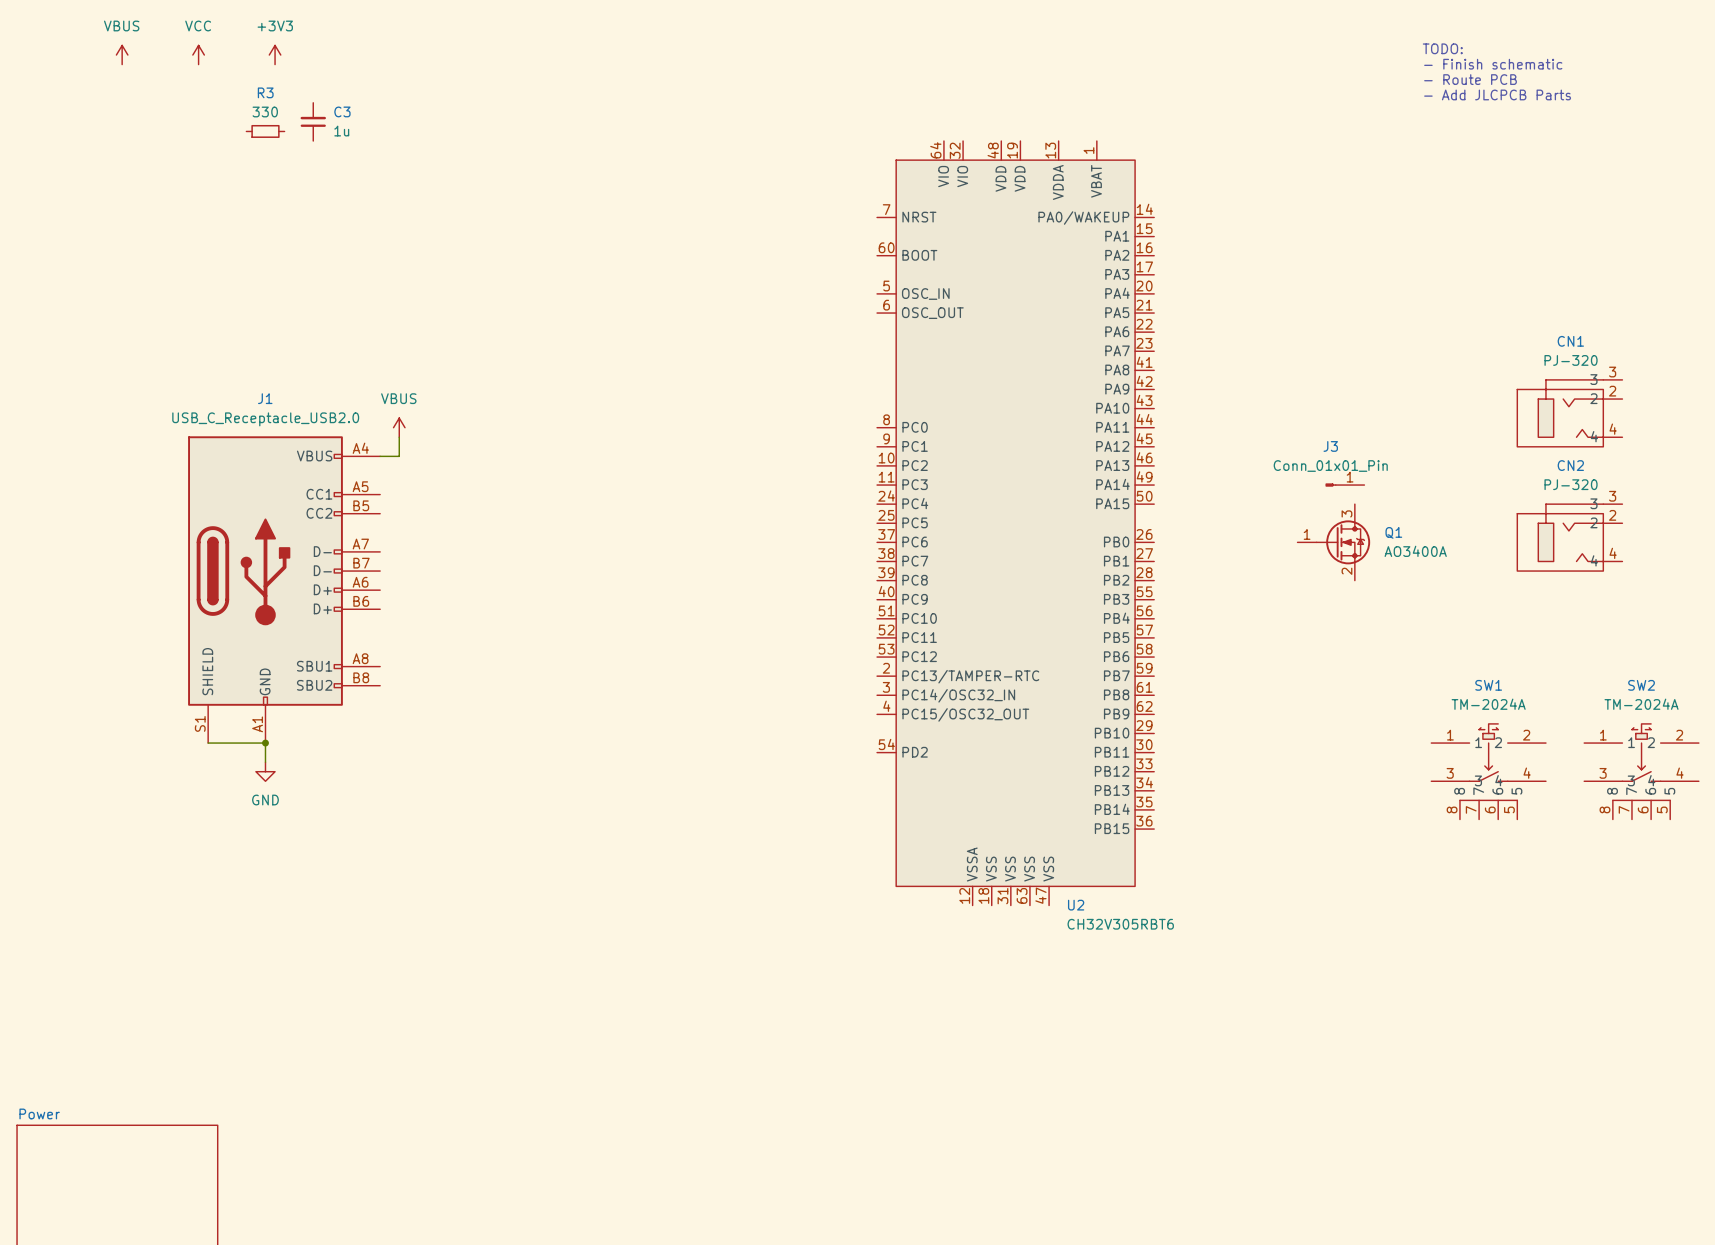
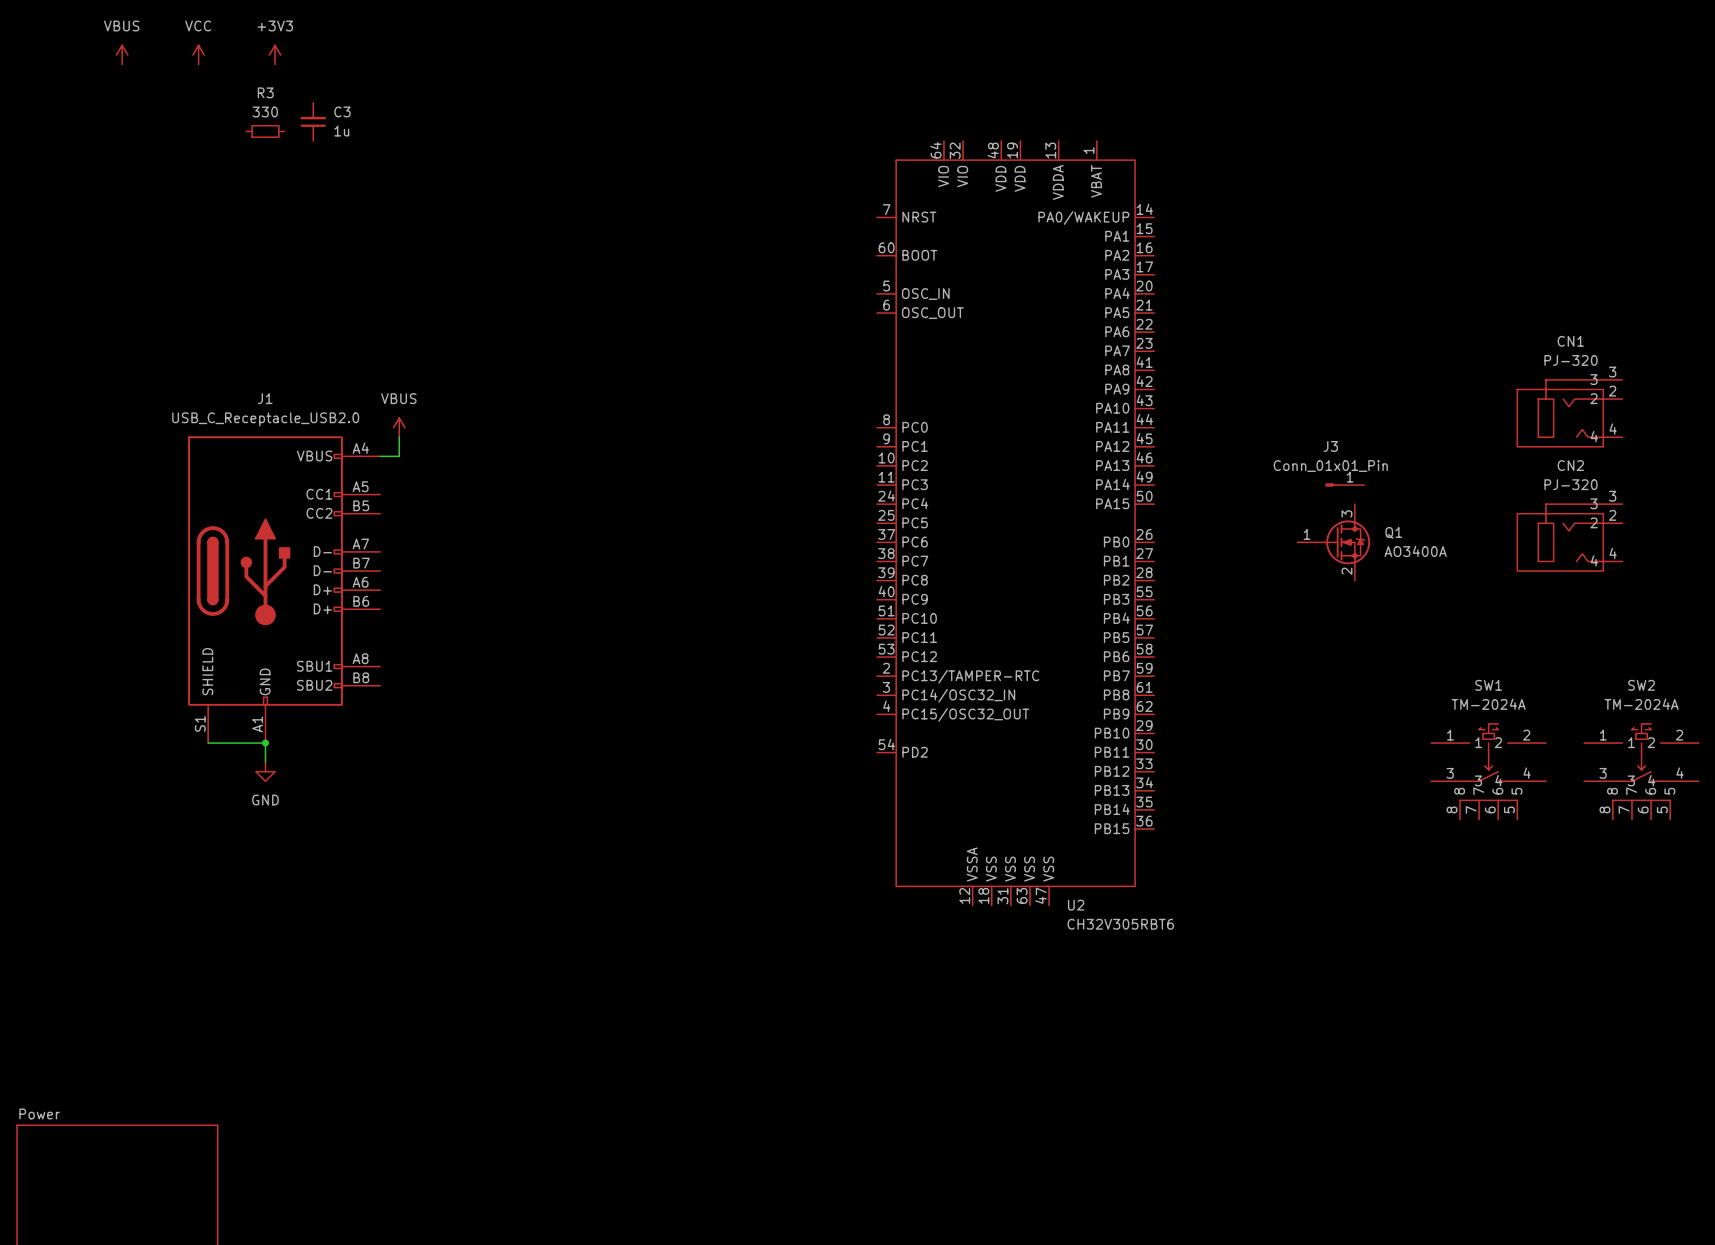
text: TODO: (1442, 48) -> none
text: - Finish schematic (1493, 64) -> none
text: - Route PCB (1470, 79) -> none
text: - Add JLCPCB Parts (1497, 94) -> none

